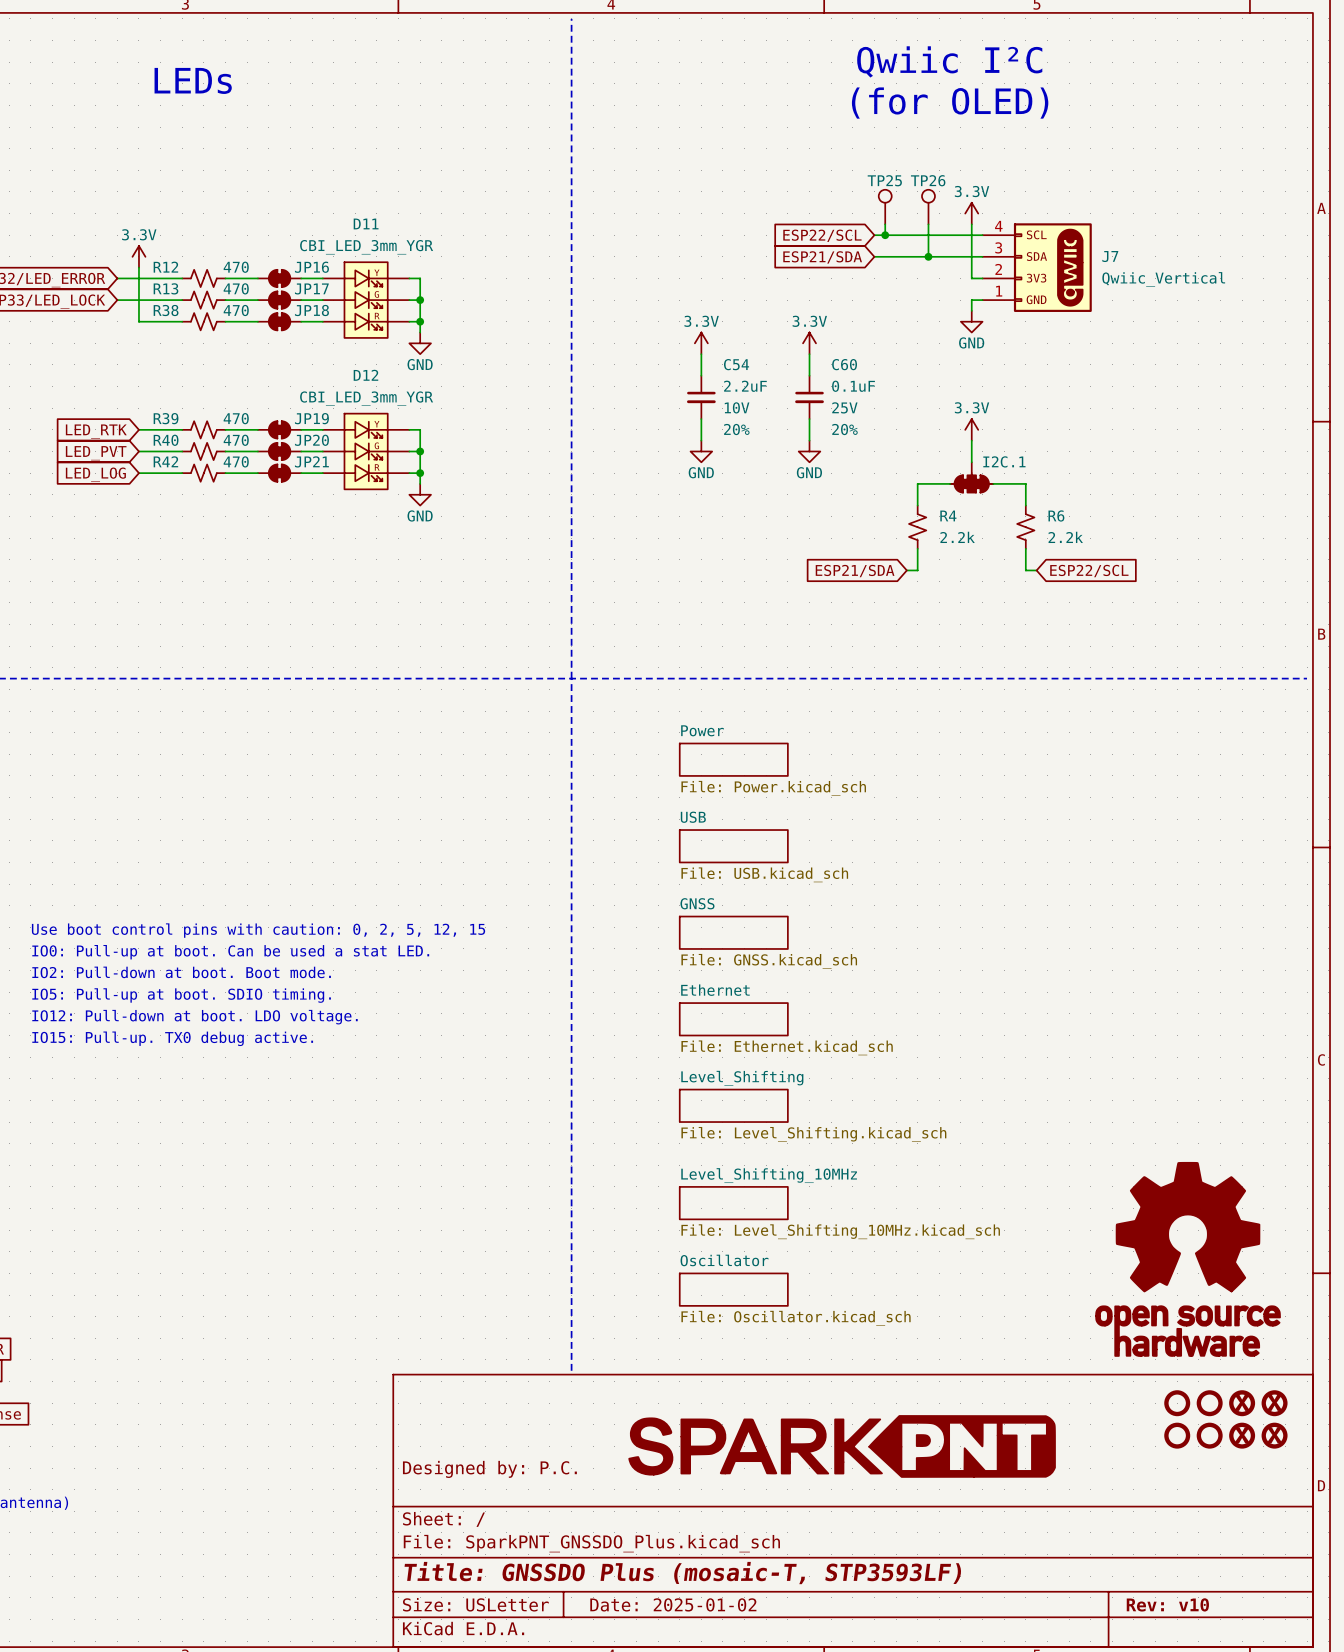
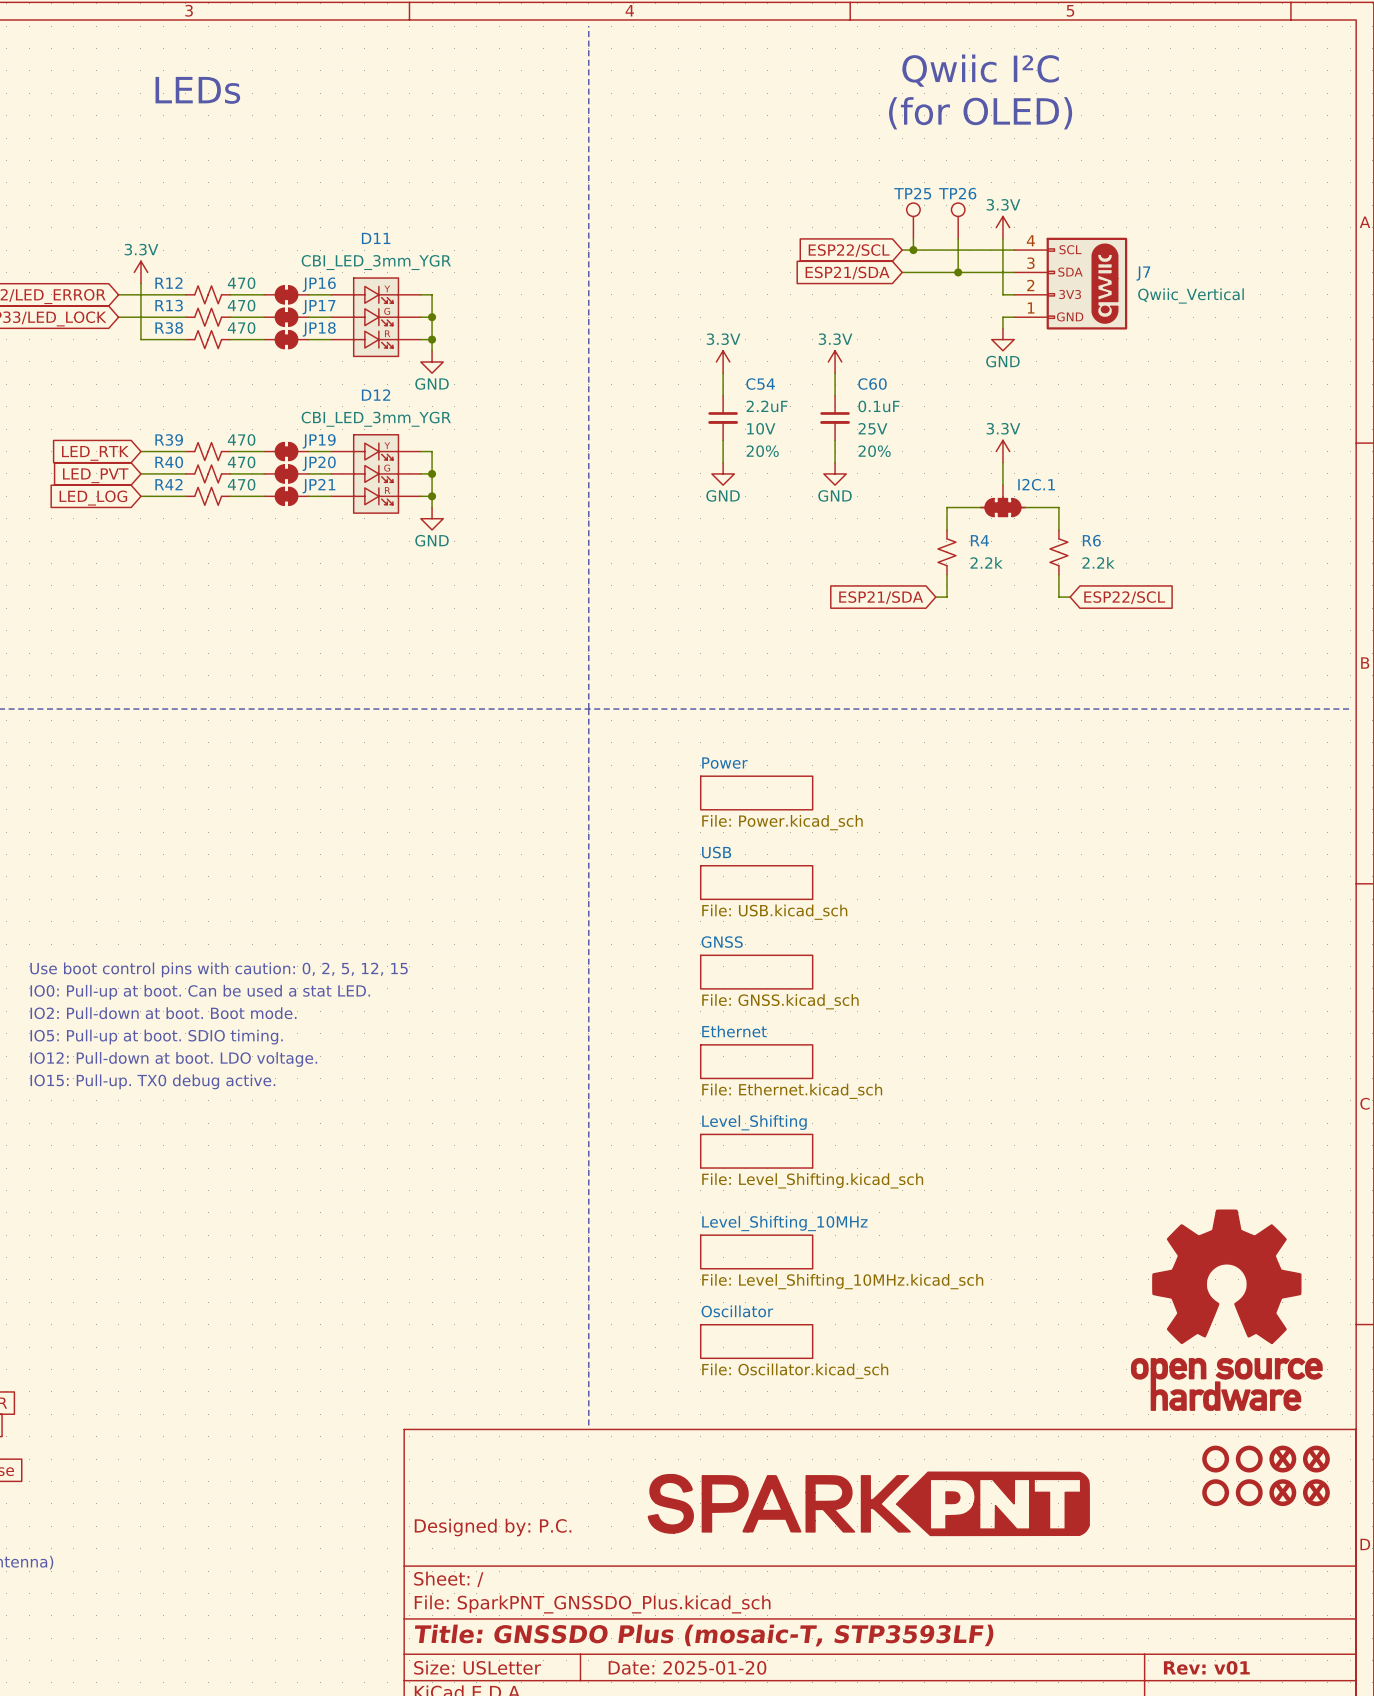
title block: Date: 2025-01-02 (673, 1604) -> Date: 2025-01-20 (687, 1667)
title block: Rev: v10 (1167, 1604) -> Rev: v01 (1206, 1667)

